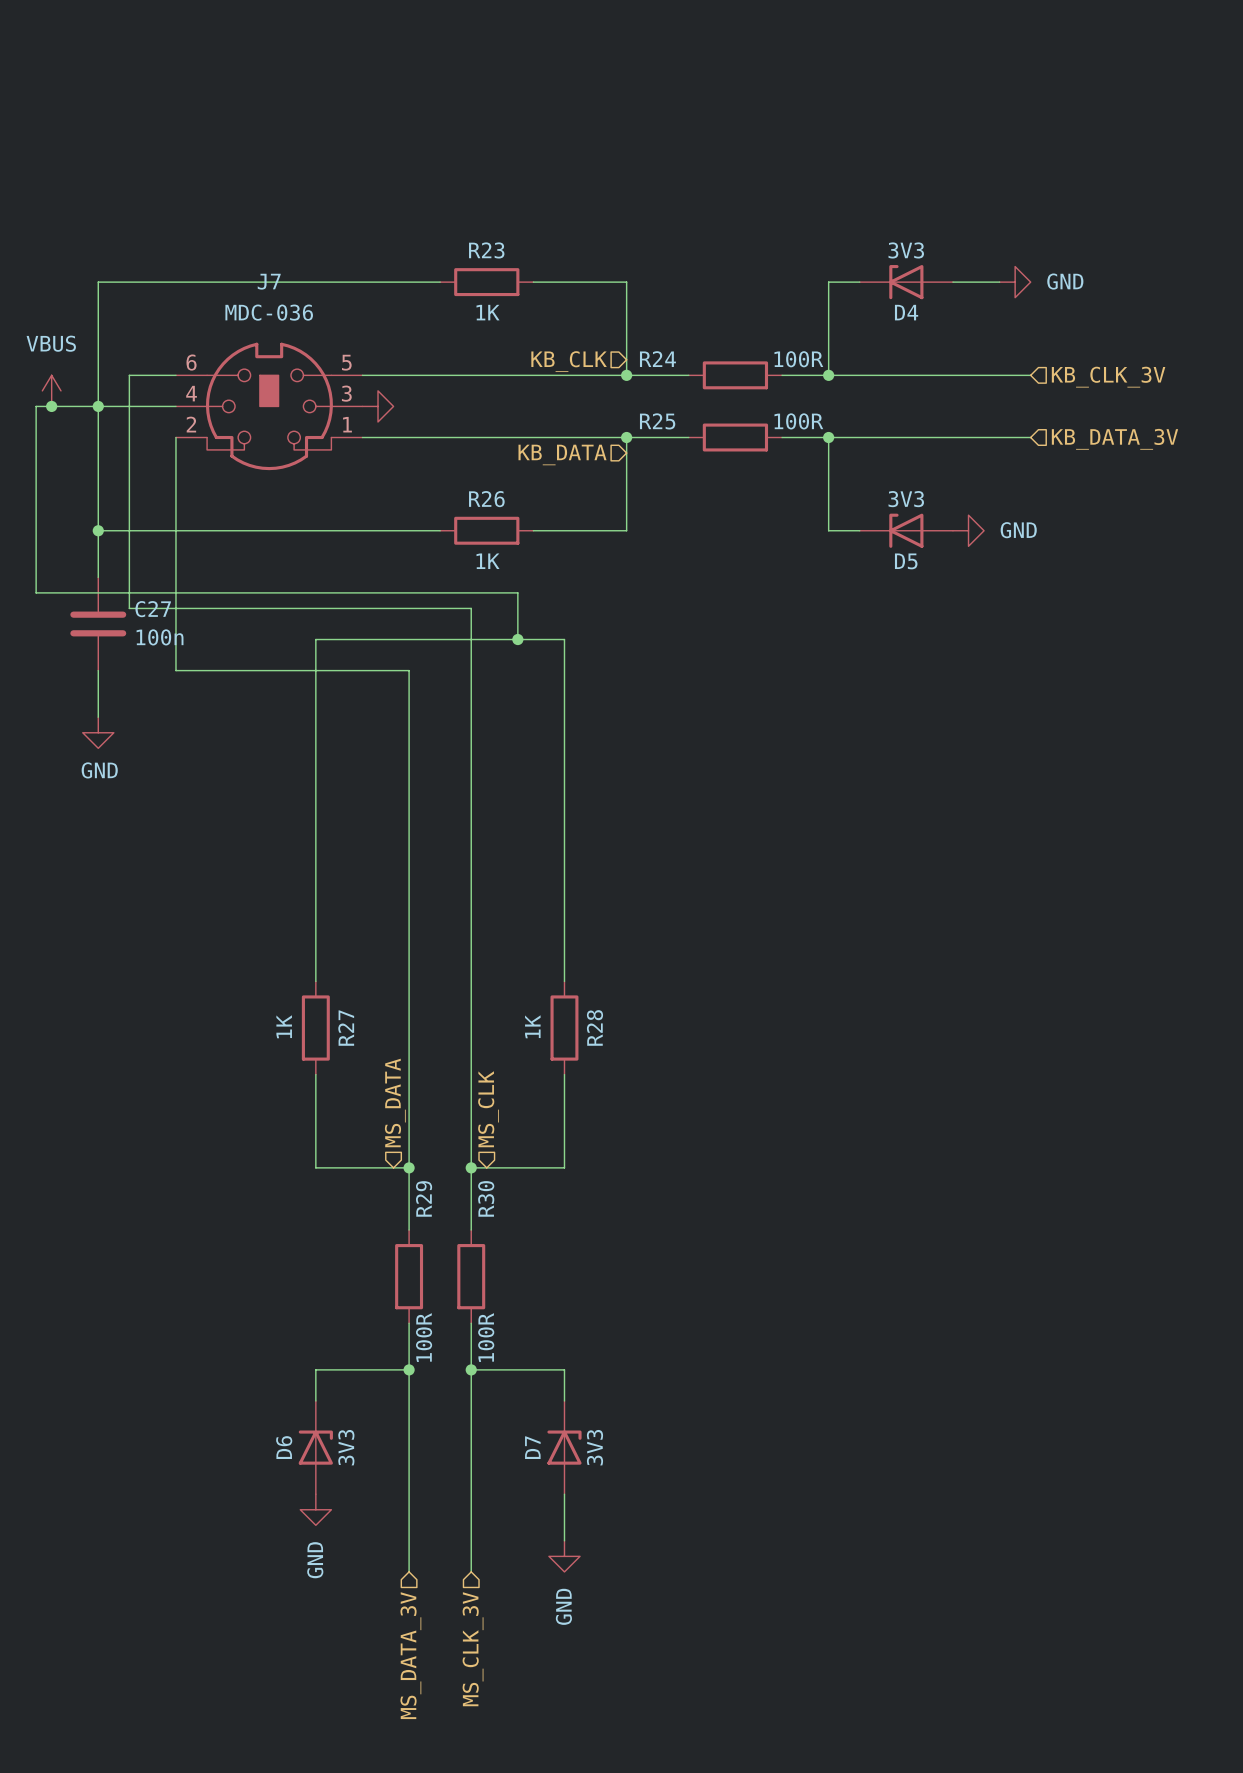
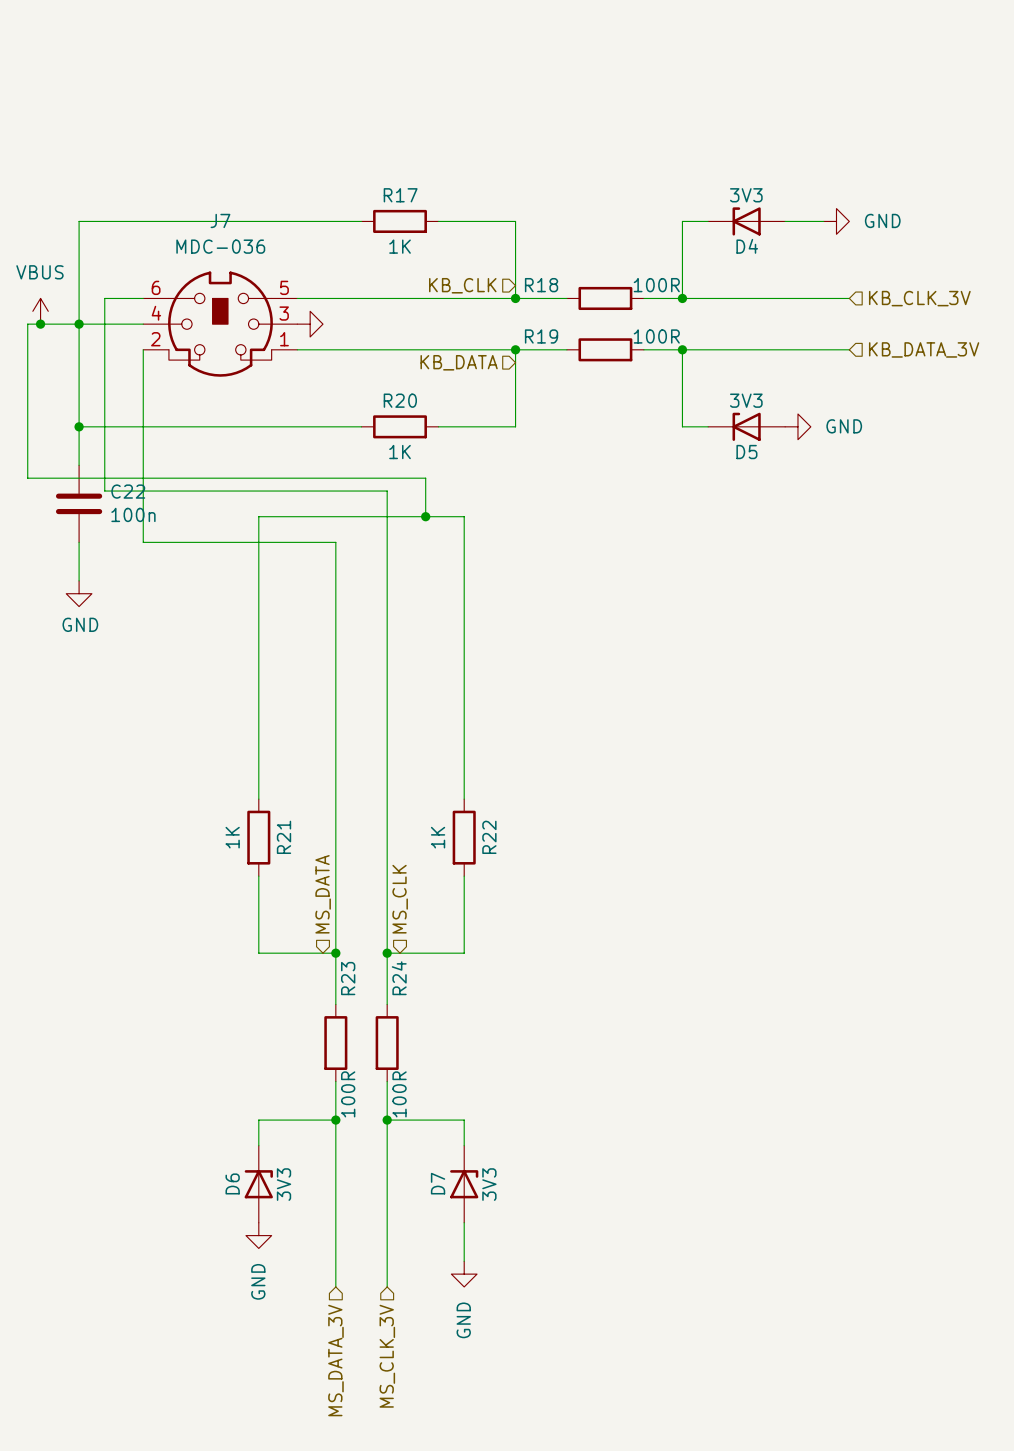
R23 name: R23 (486, 250) -> R17 (400, 195)
R24 name: R24 (657, 359) -> R18 (541, 285)
R25 name: R25 (657, 421) -> R19 (541, 336)
R26 name: R26 (486, 499) -> R20 (400, 400)
C27 name: C27 (153, 609) -> C22 (128, 491)
R28 name: R28 (594, 1027) -> R22 (489, 837)
R27 name: R27 (346, 1028) -> R21 (284, 837)
R29 name: R29 (424, 1198) -> R23 (348, 978)
R30 name: R30 (486, 1198) -> R24 (399, 978)

